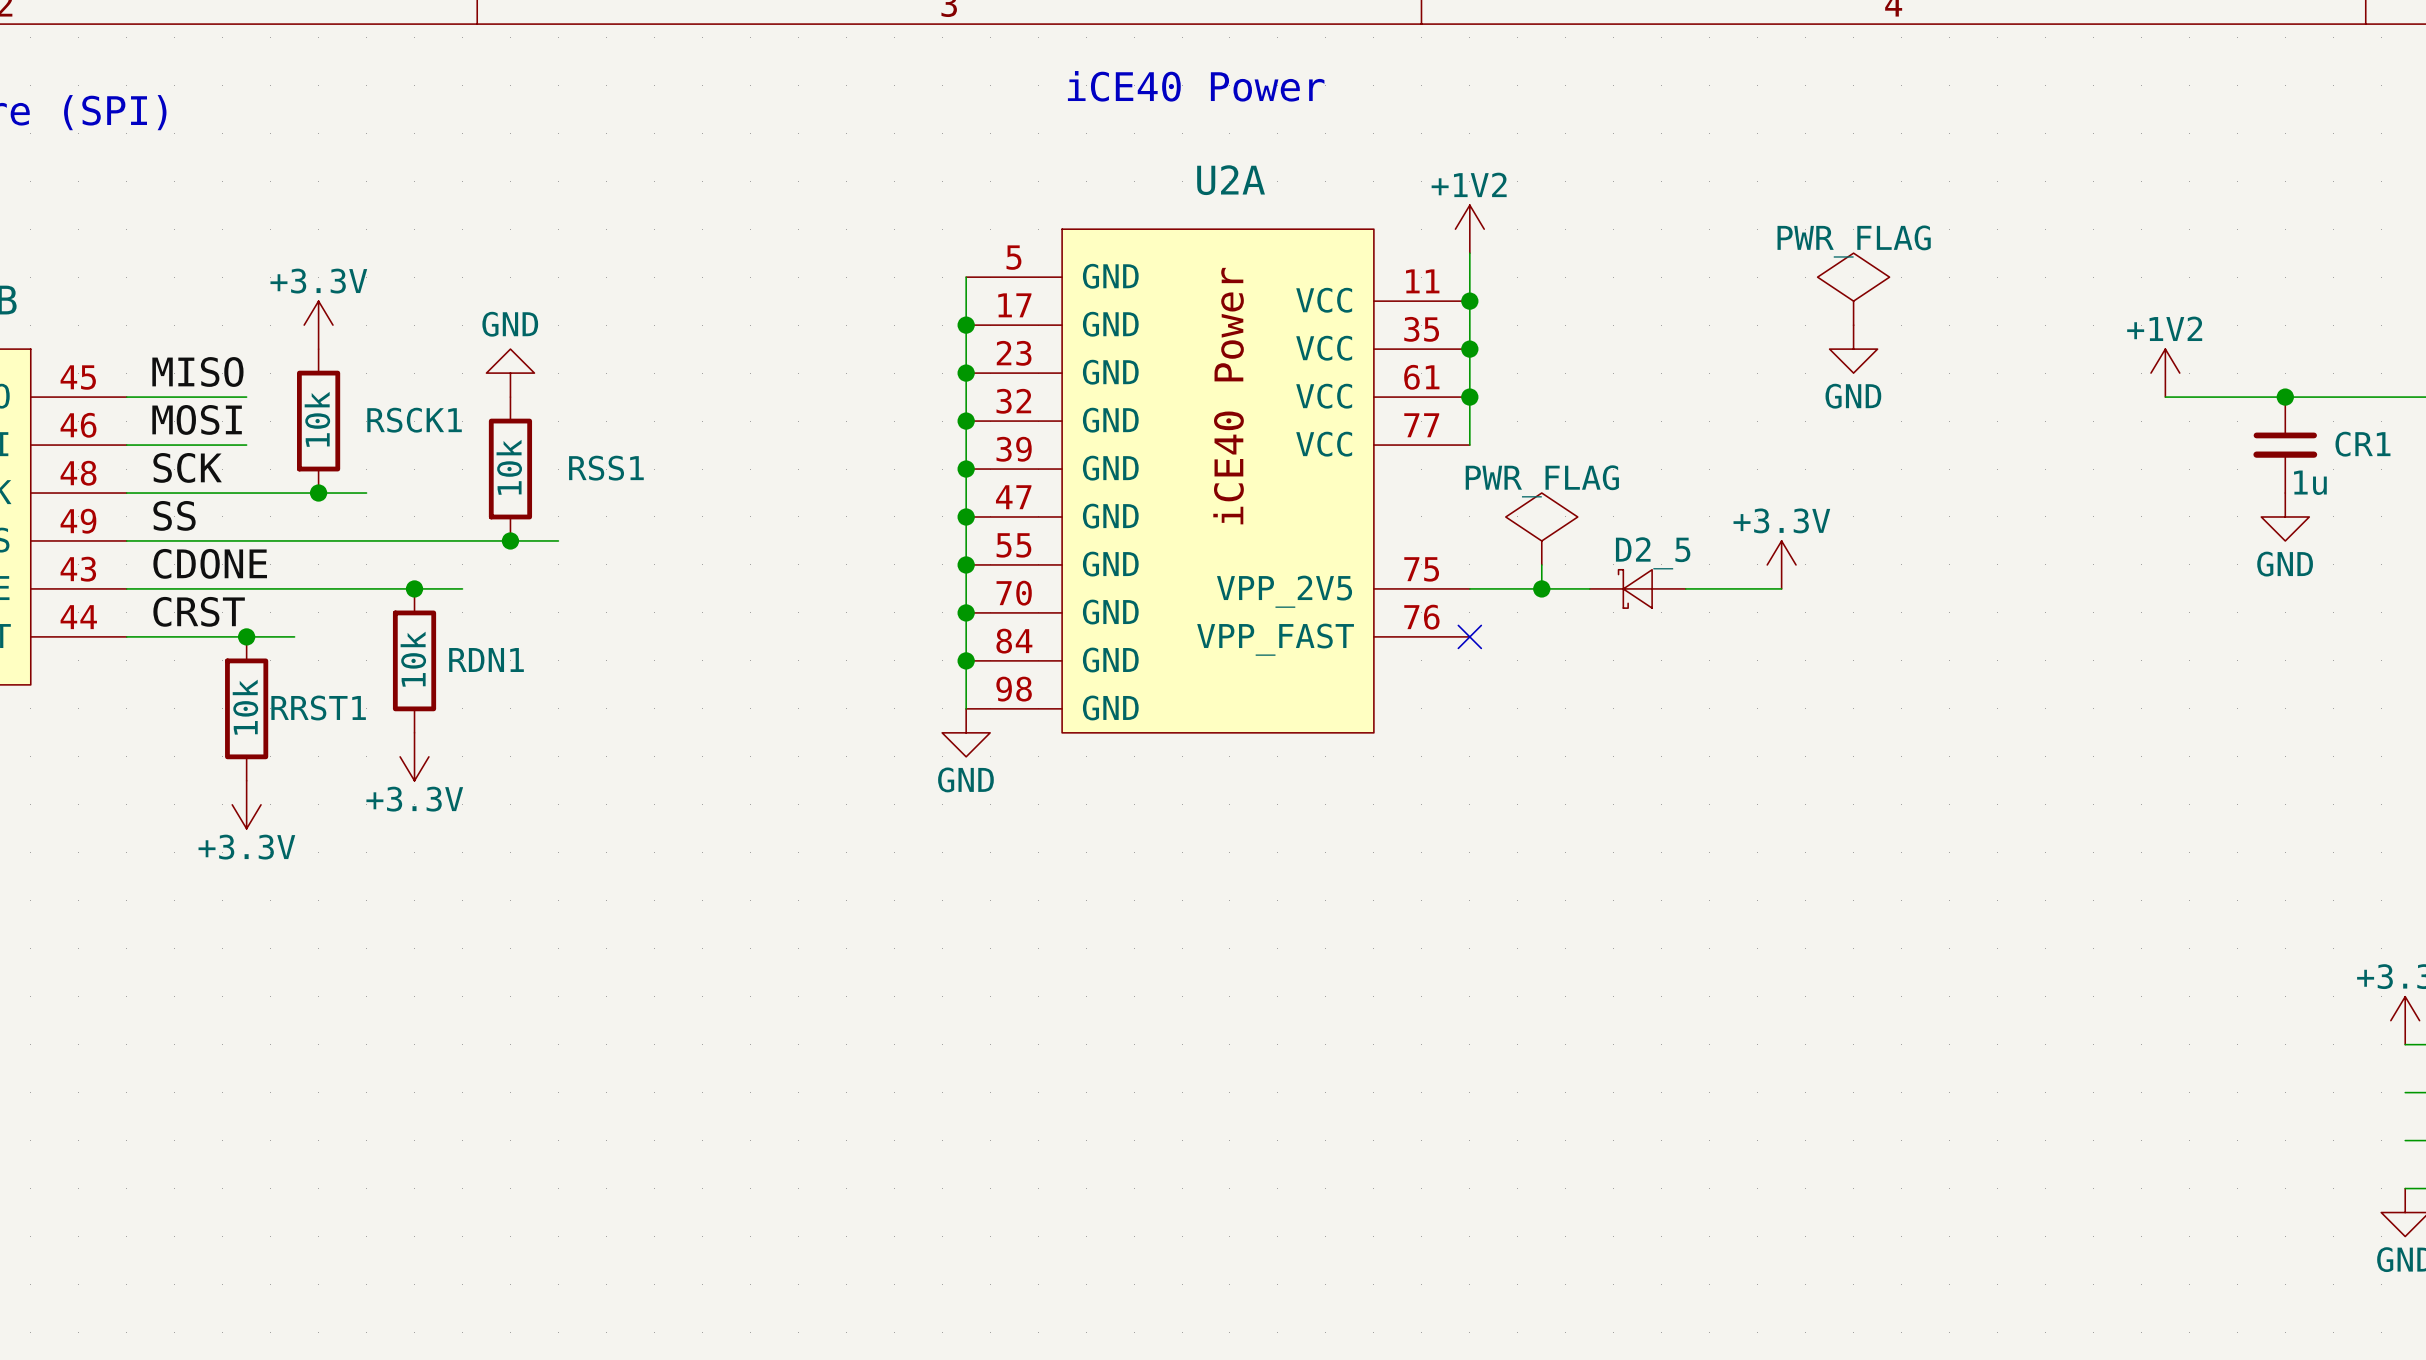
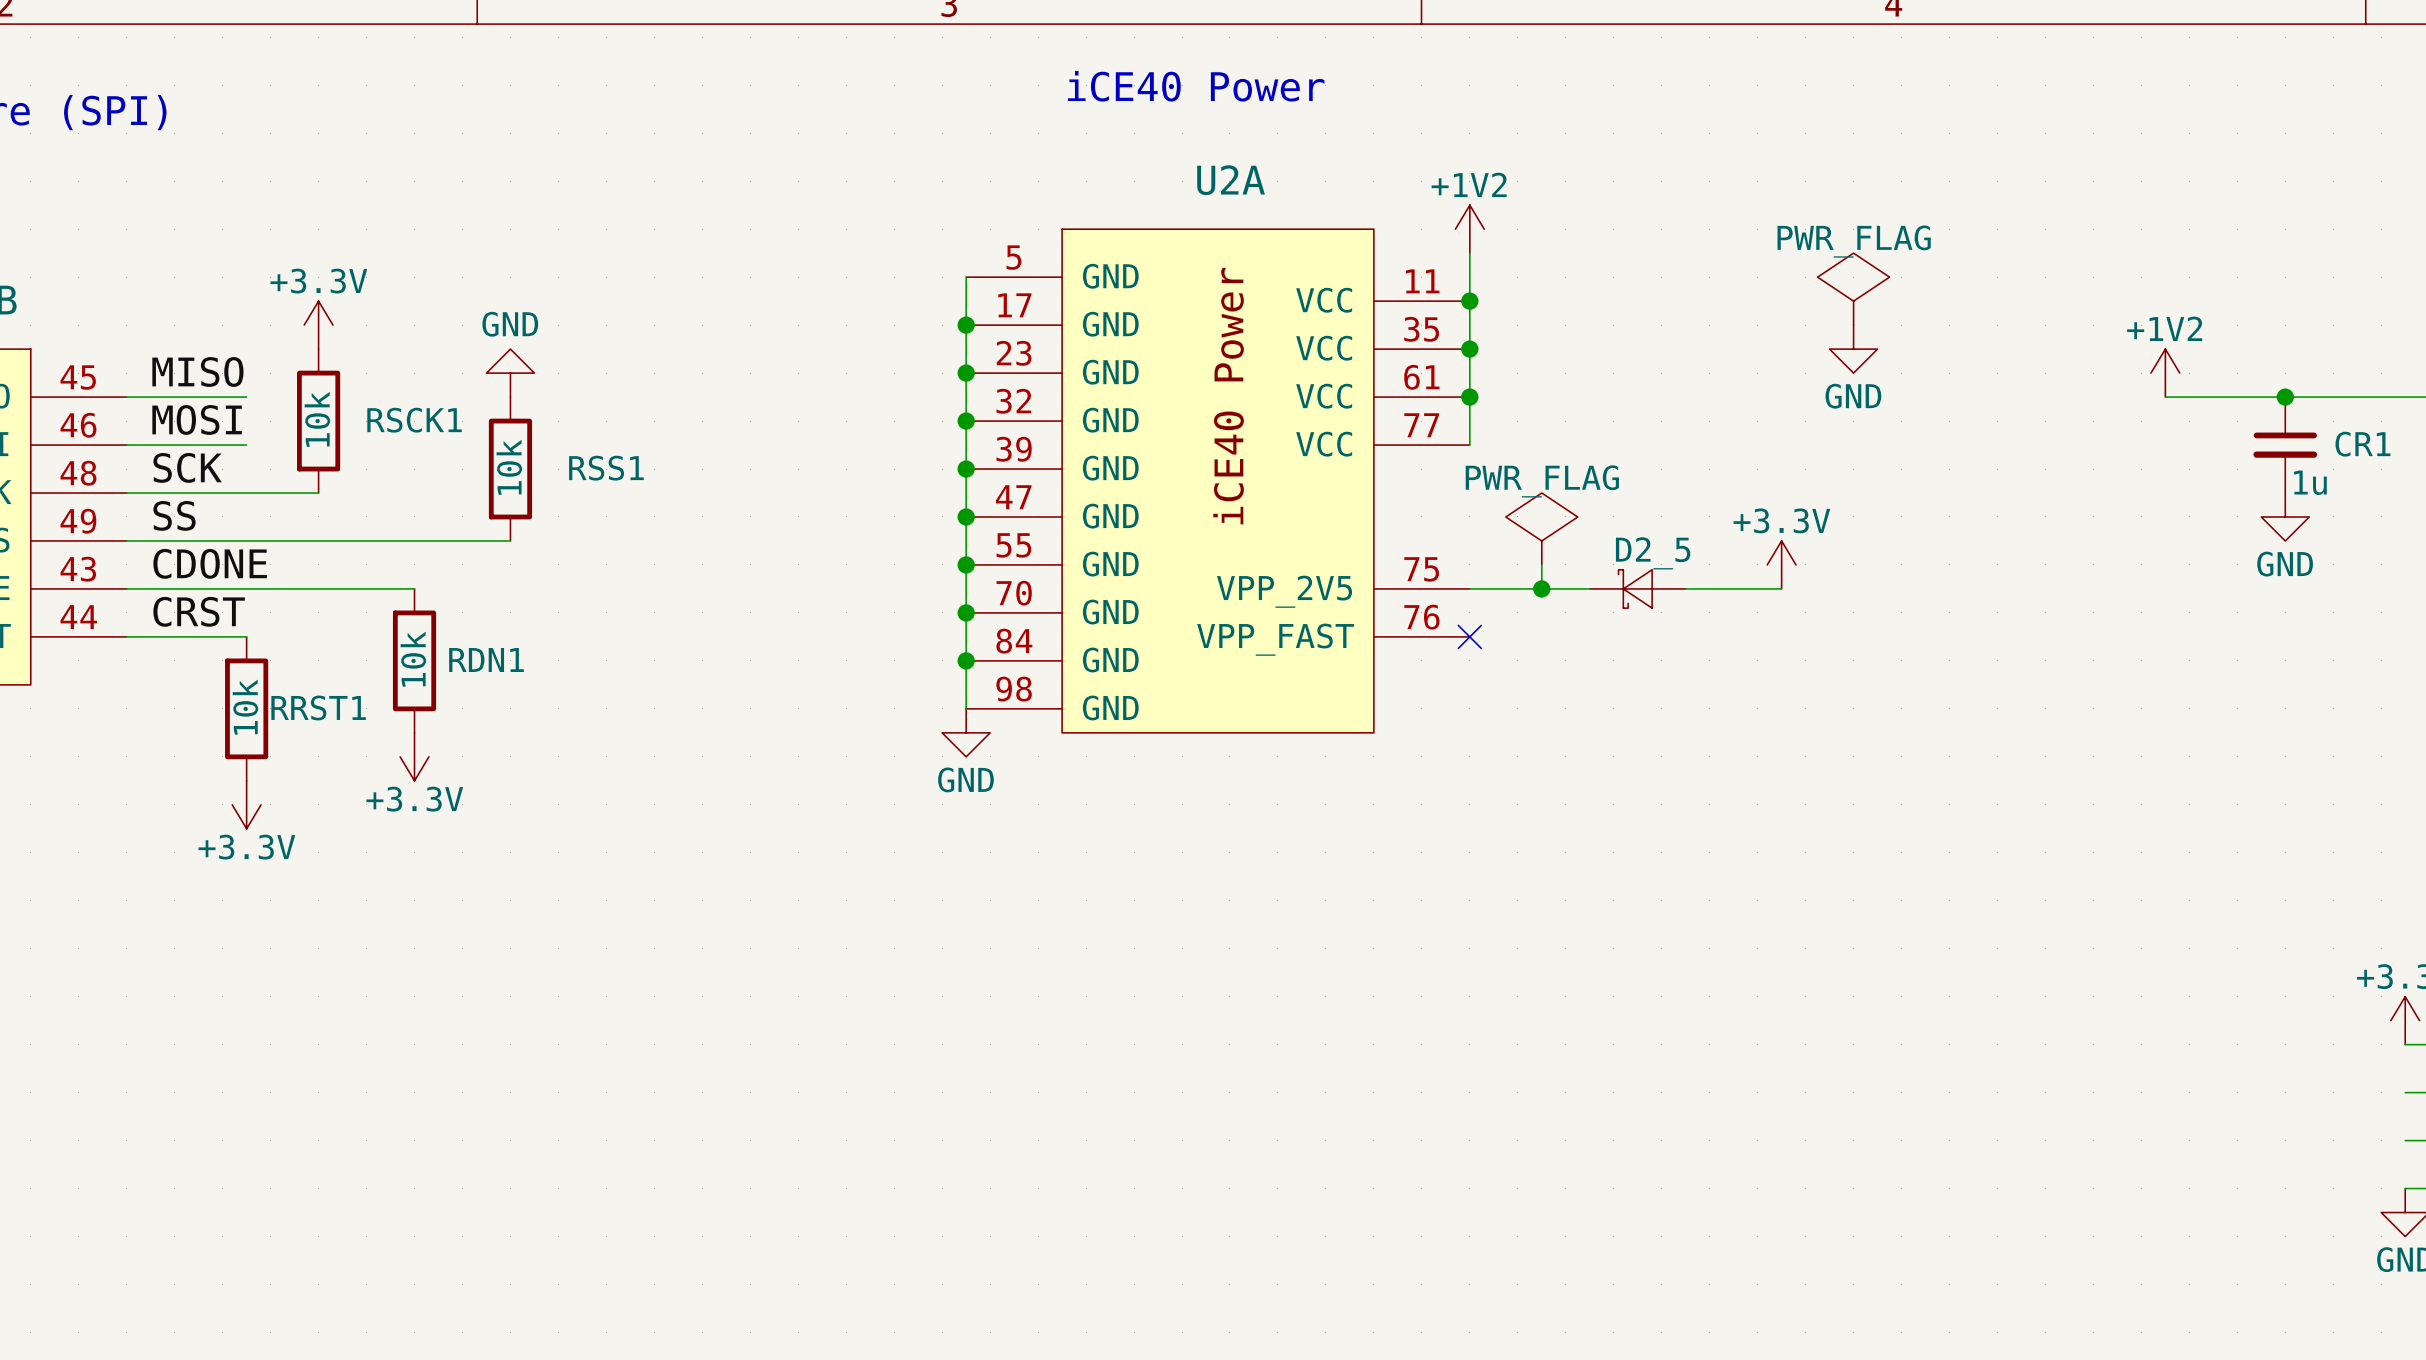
wire: (318, 493) (366, 493) -> none
junction: (318, 493) -> none
wire: (510, 540) (558, 540) -> none
junction: (510, 540) -> none
wire: (414, 588) (462, 588) -> none
junction: (414, 588) -> none
wire: (246, 636) (294, 636) -> none
junction: (246, 636) -> none

